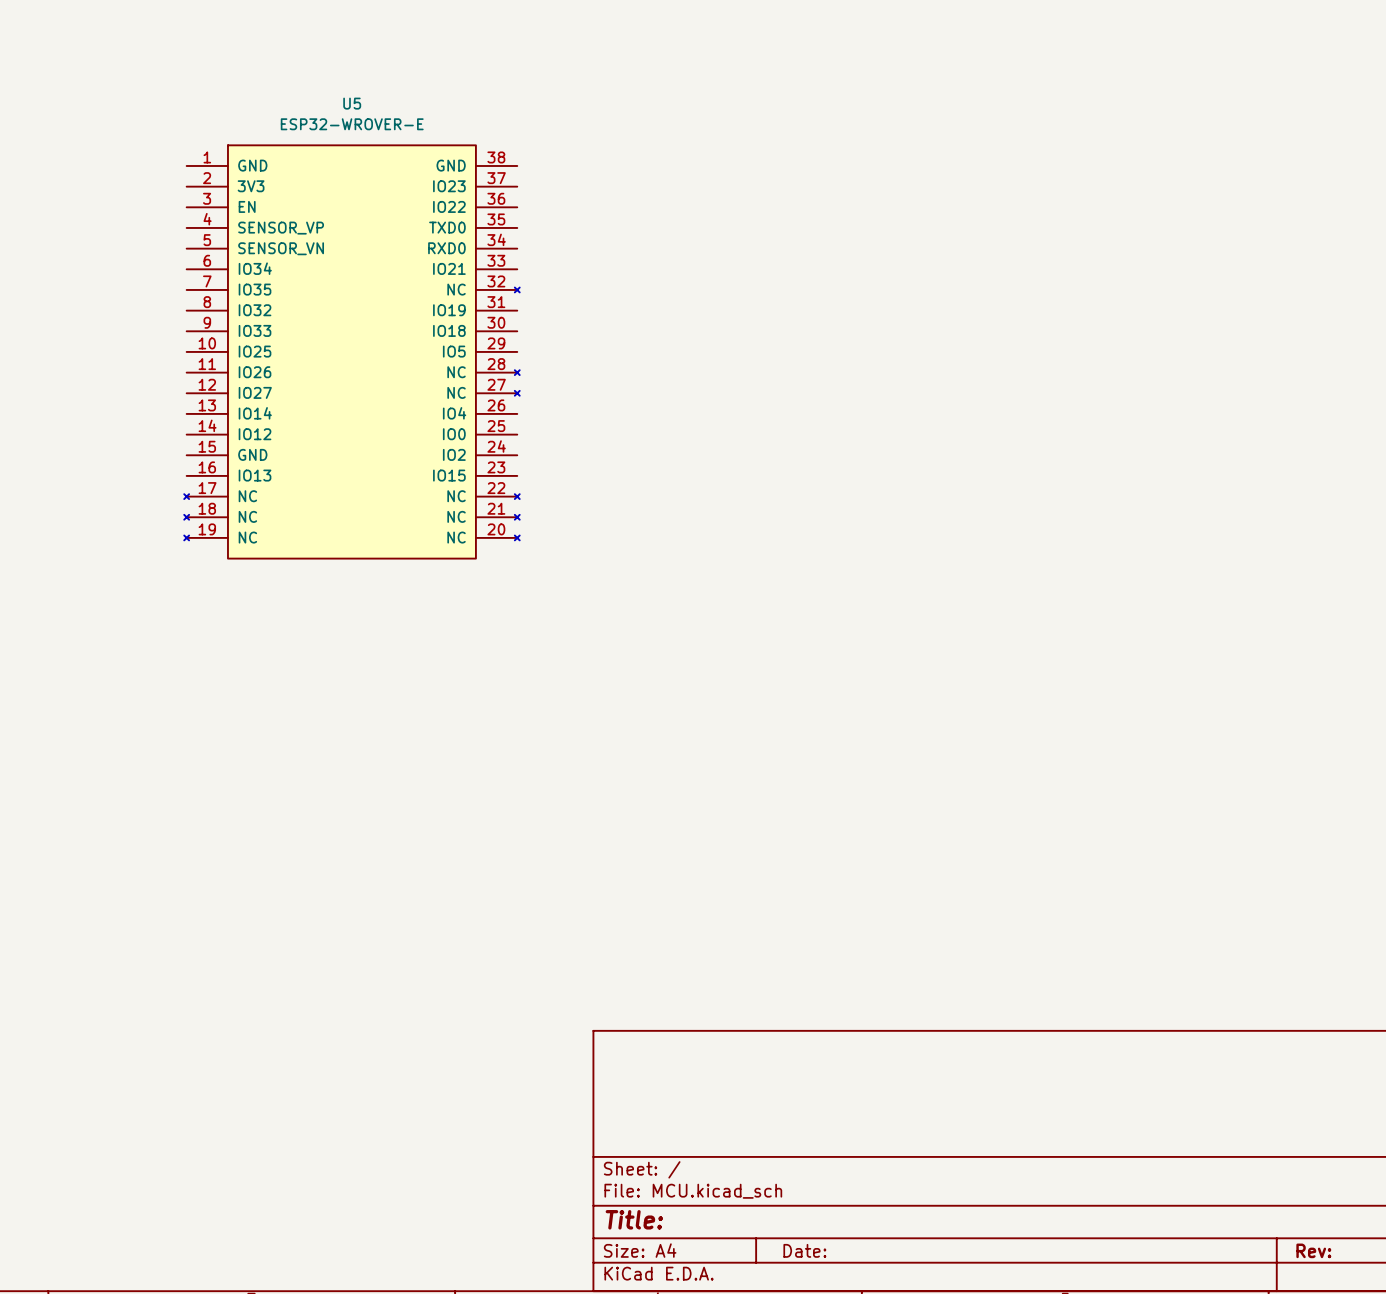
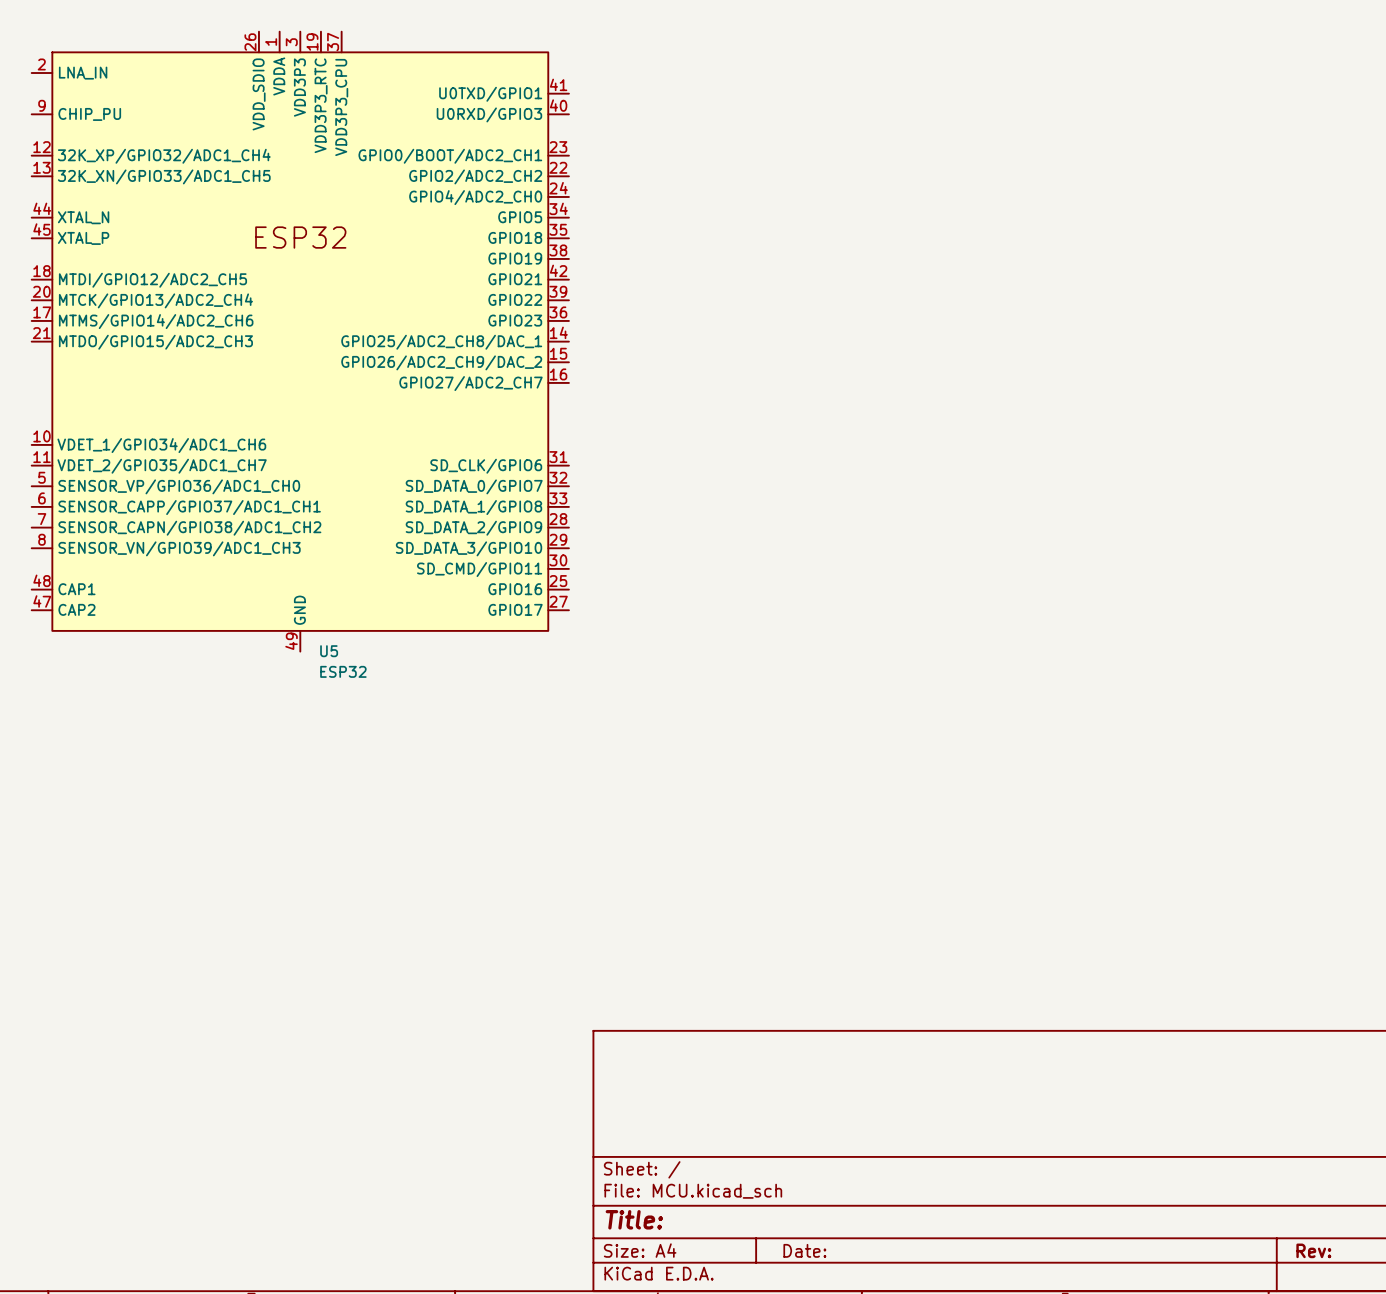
U5 name position: U5 (352, 103) -> U5 (329, 651)
U5 value: ESP32-WROVER-E (352, 124) -> ESP32 (343, 671)
U5 symbol: [184, 145, 520, 559] -> [31, 31, 569, 652]

